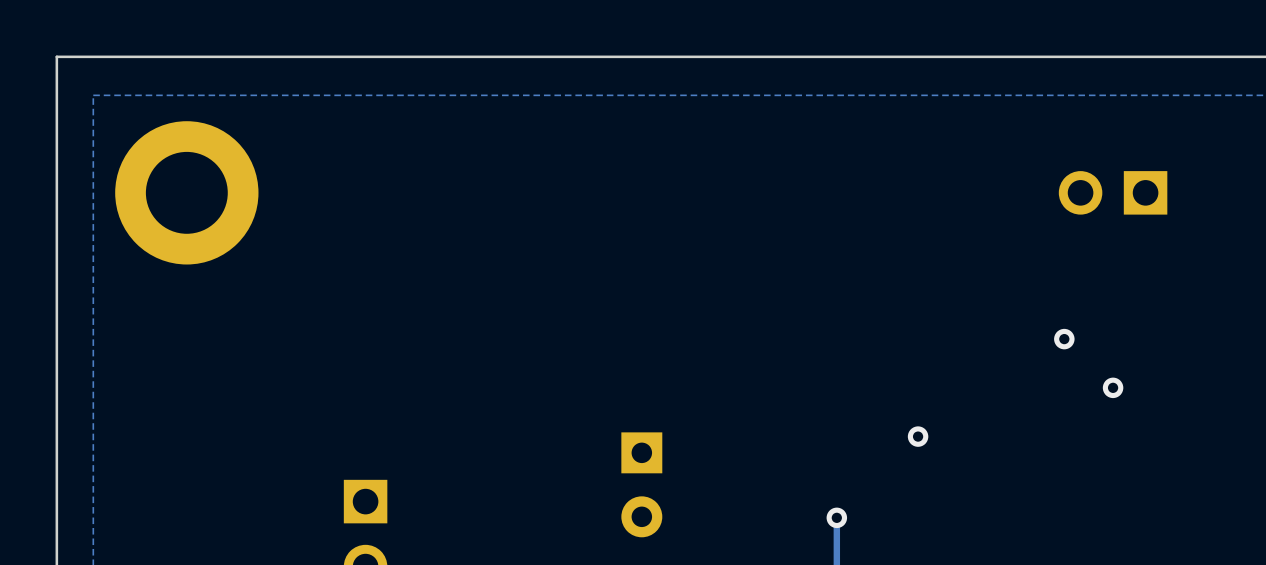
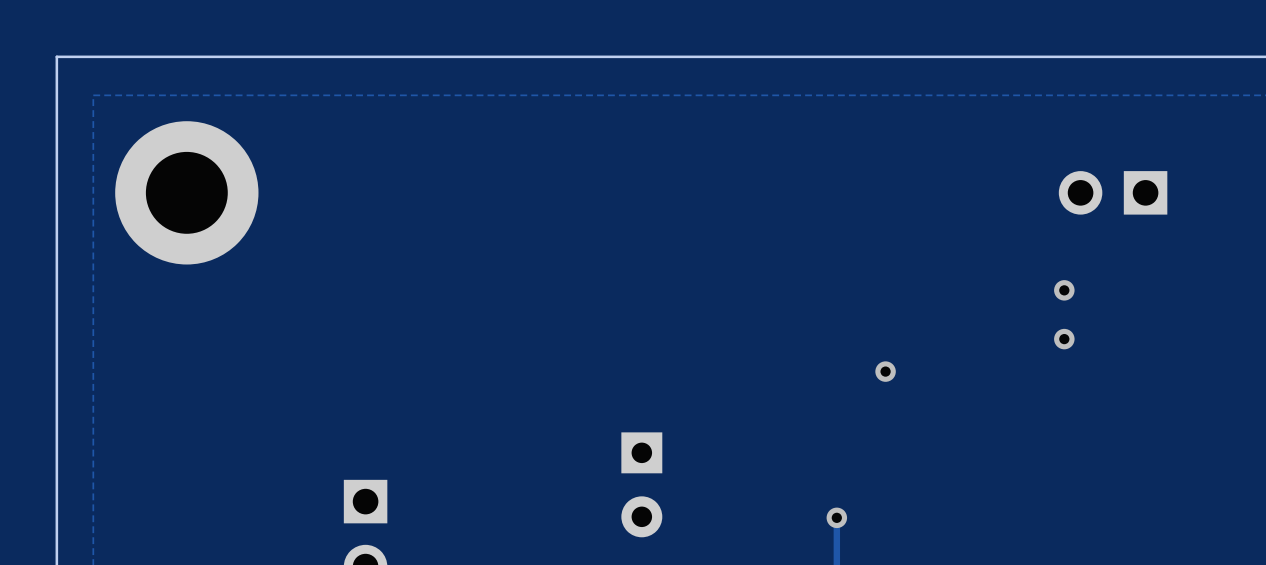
via: none -> (1064, 290)
via: (1113, 387) -> none
via position: (918, 436) -> (885, 371)

